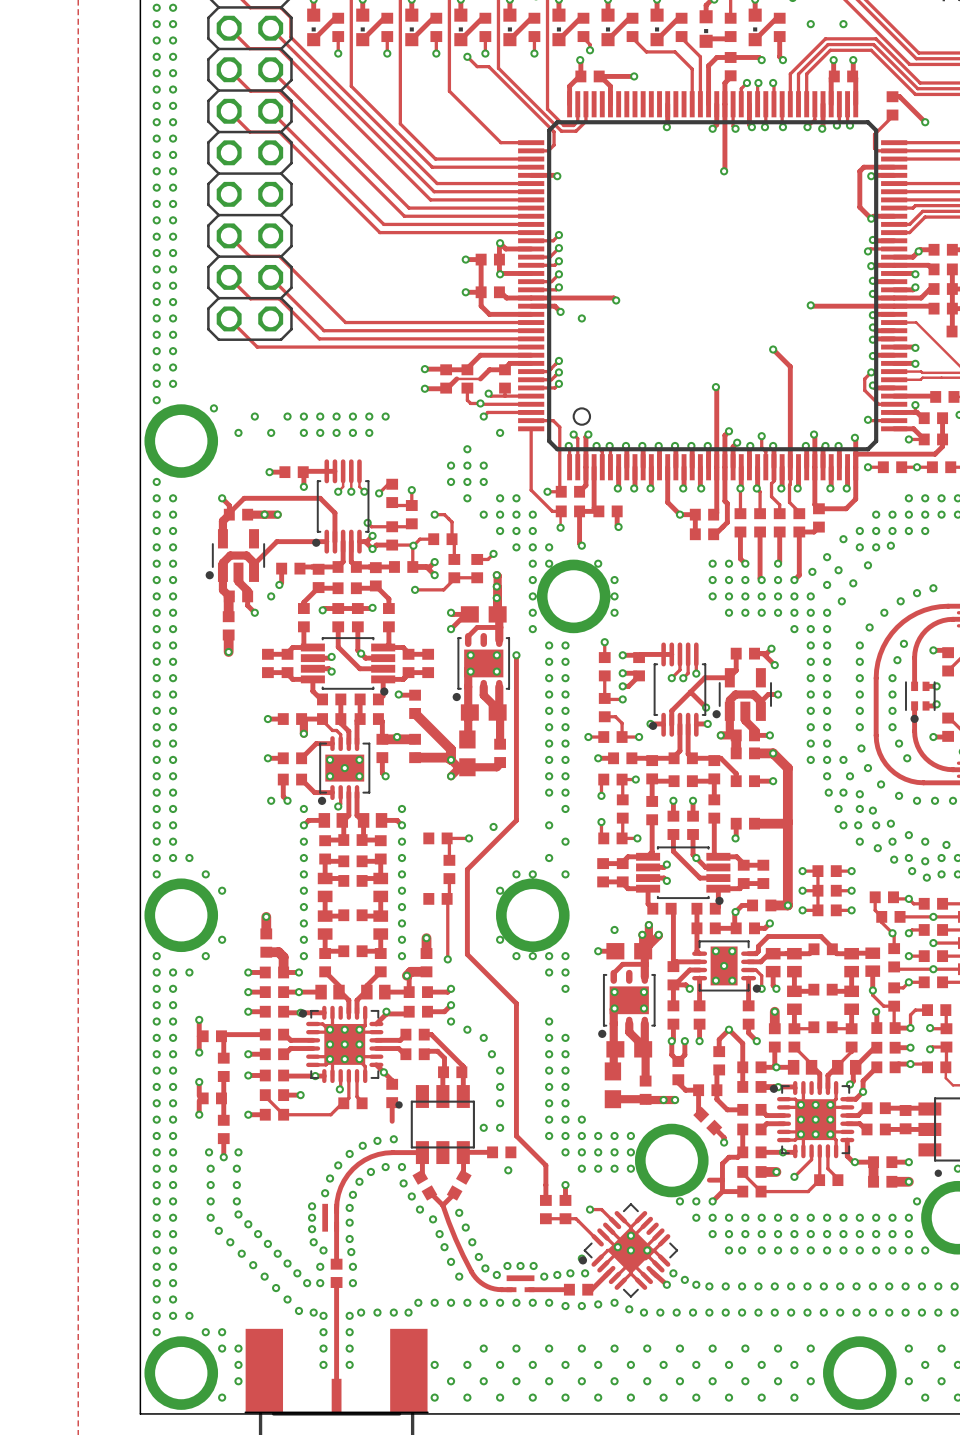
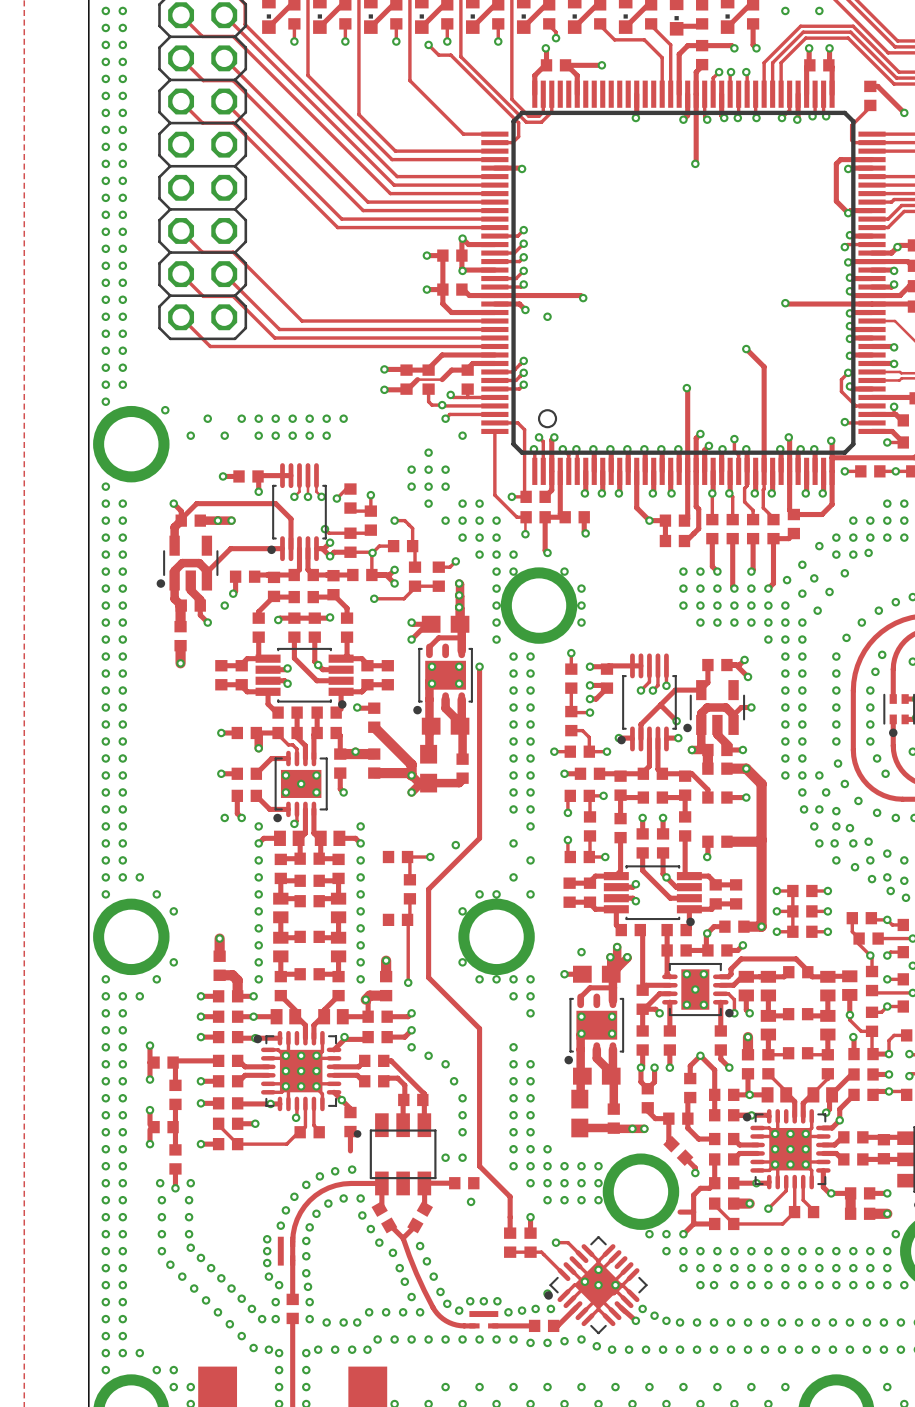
via: none -> (369, 1312)
via: none -> (386, 1312)
via: none -> (403, 1312)
via: none -> (326, 1322)
via: none -> (343, 1322)
via: none -> (357, 1322)

